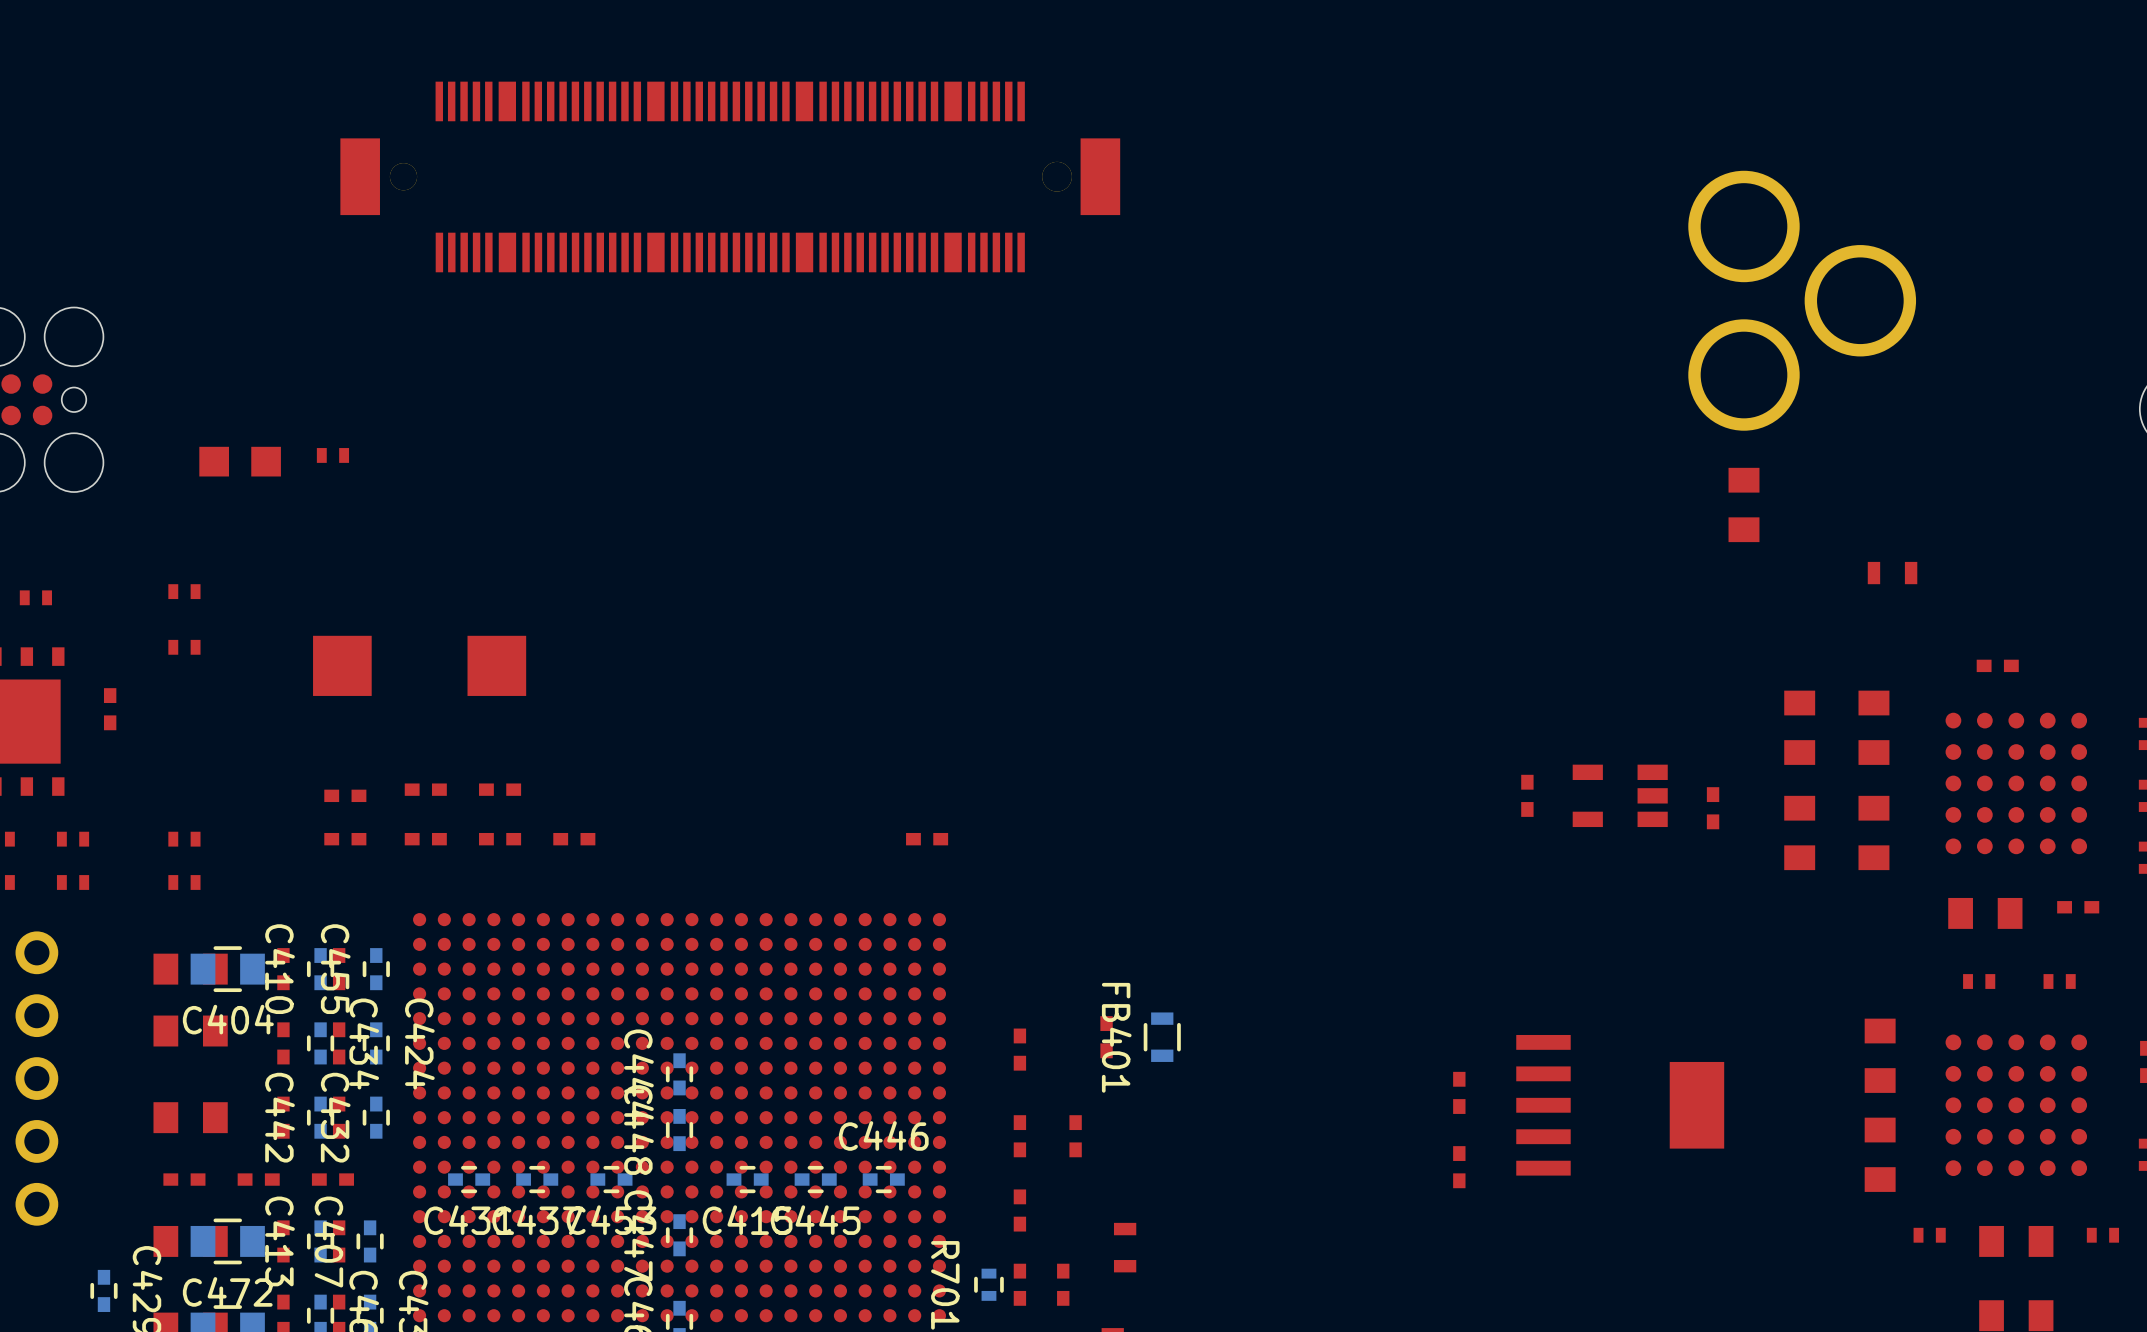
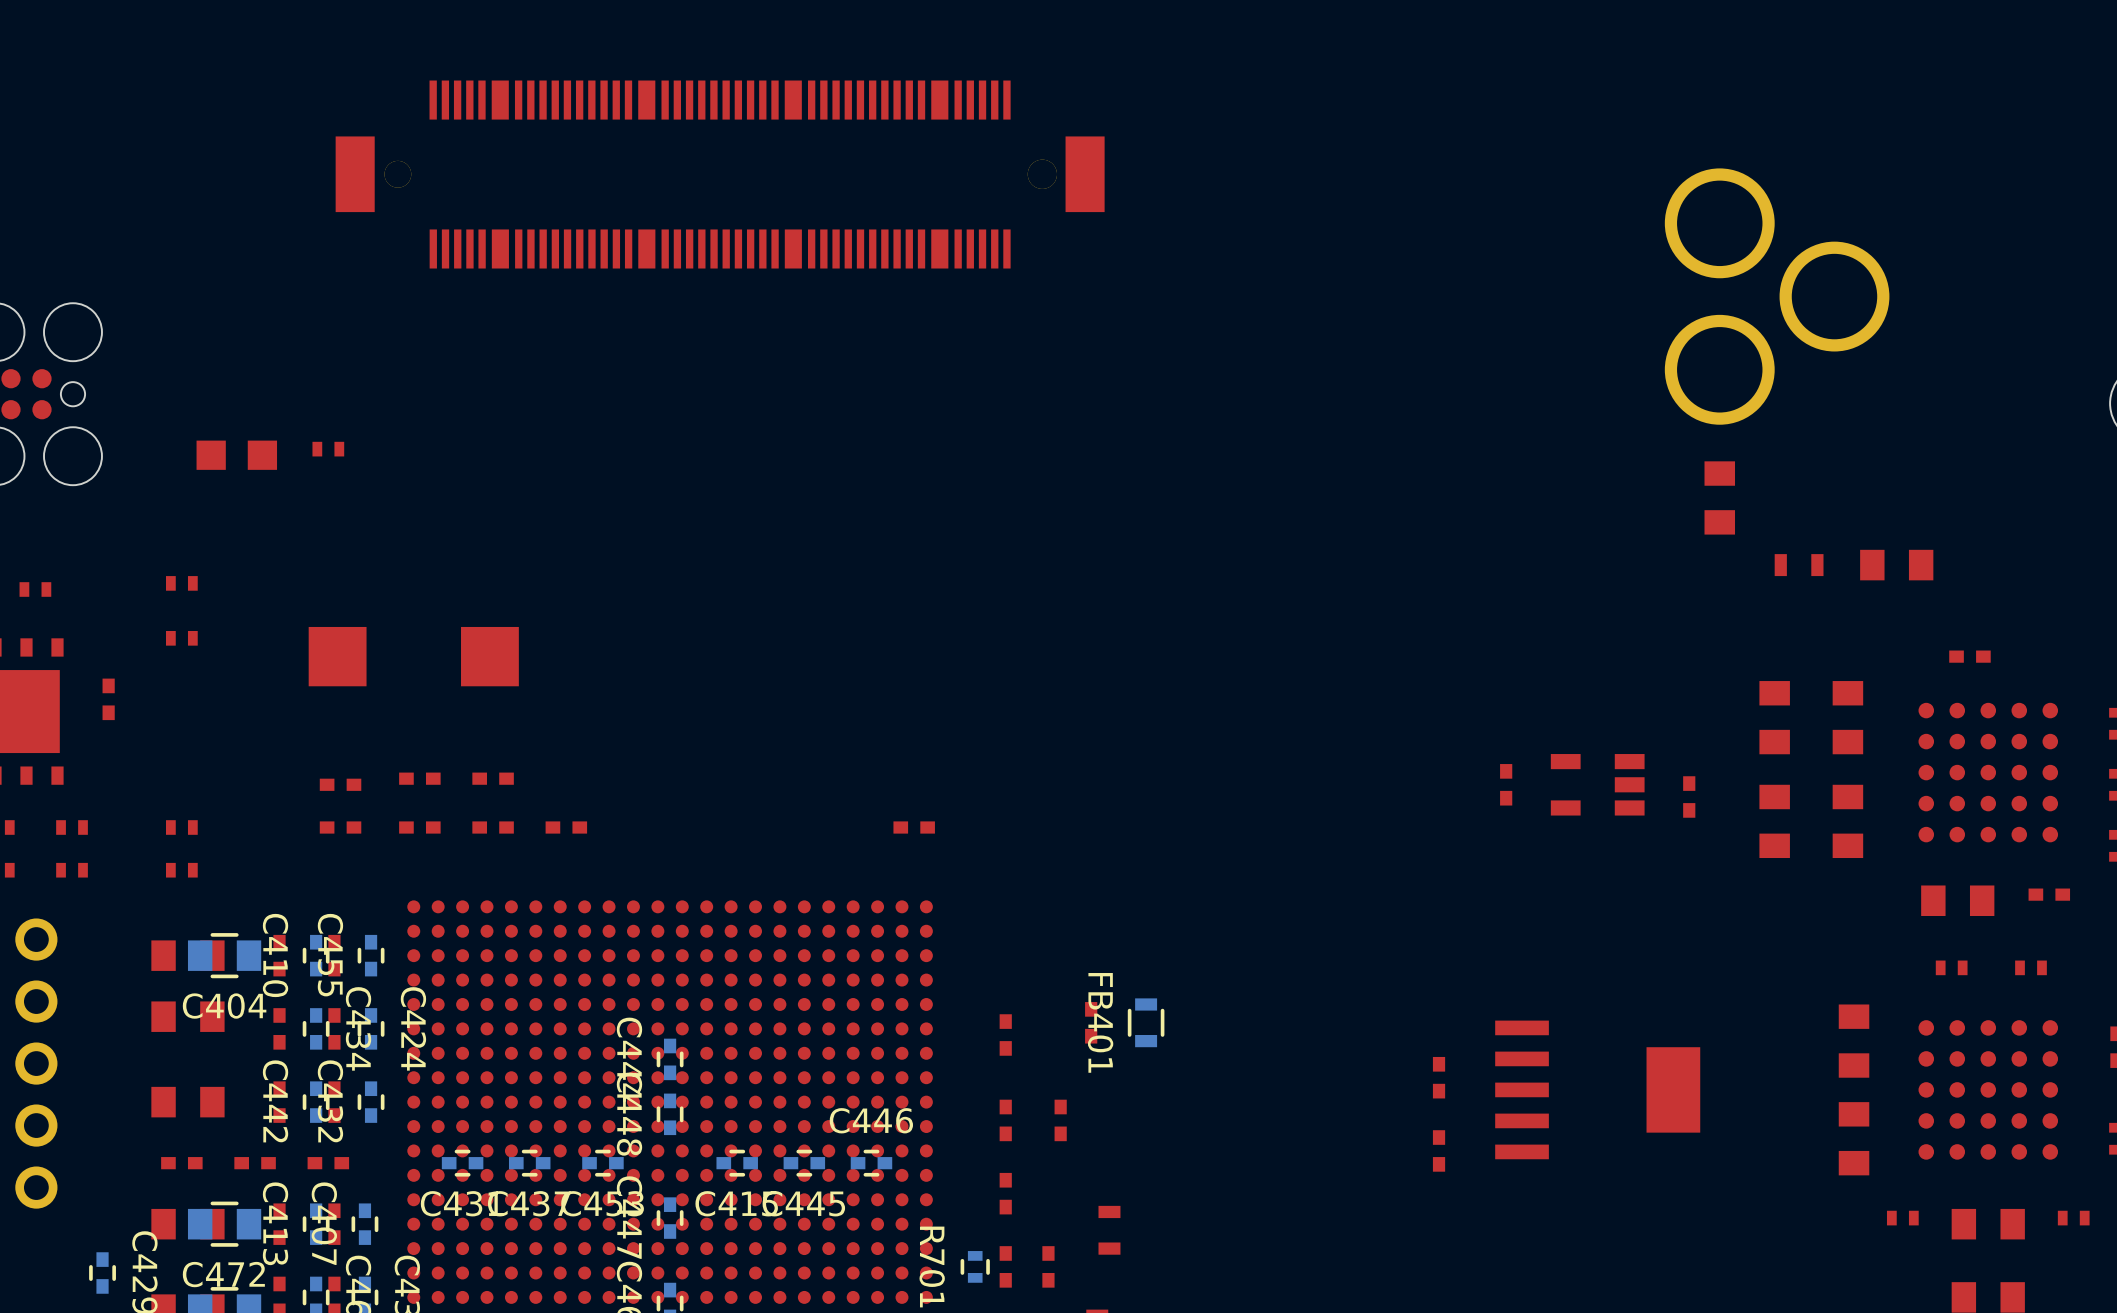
part position: (1892, 573) -> (1799, 565)
part: none -> (1896, 565)

